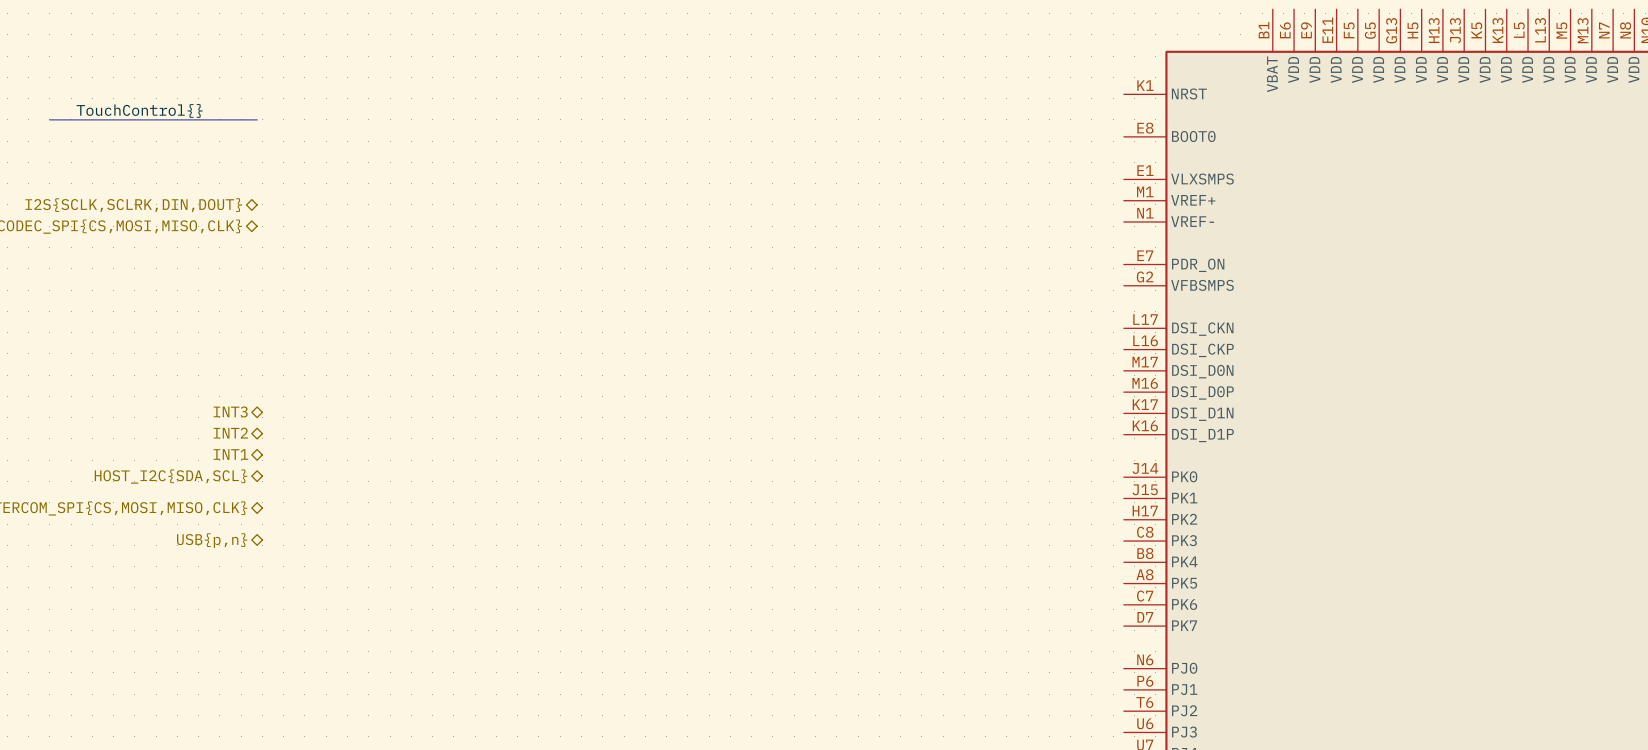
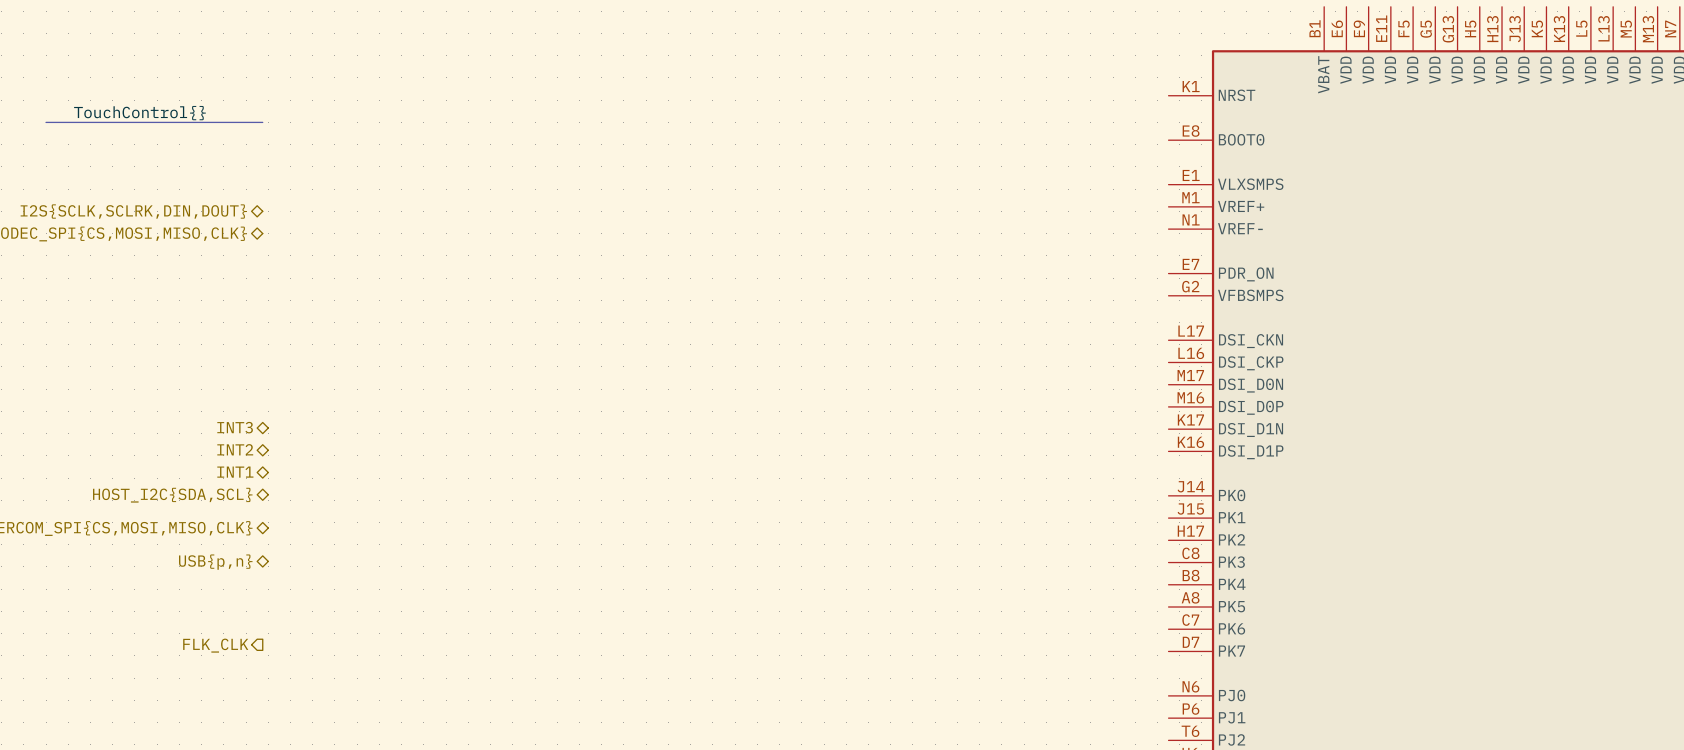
hierarchical label: none -> FLK_CLK (215, 645)

